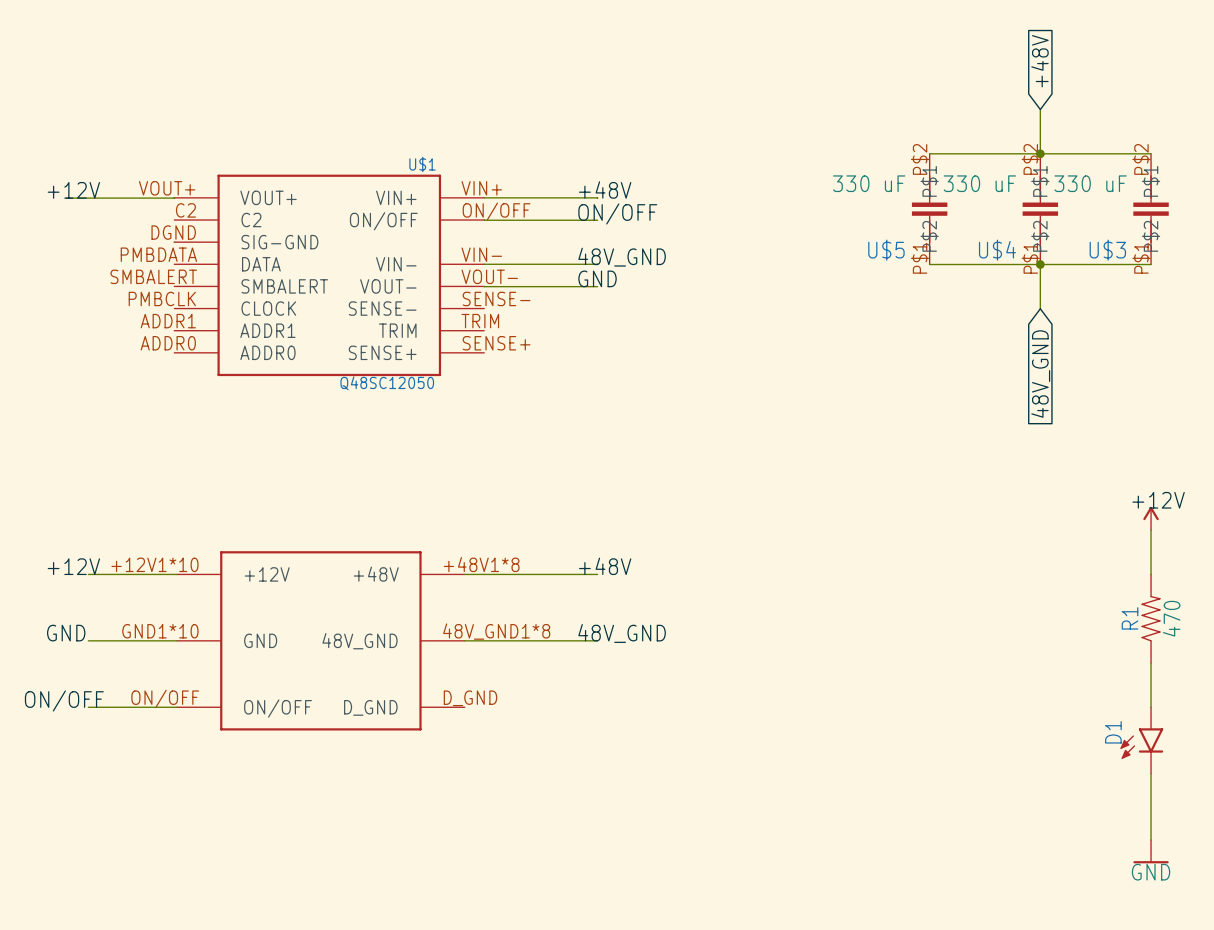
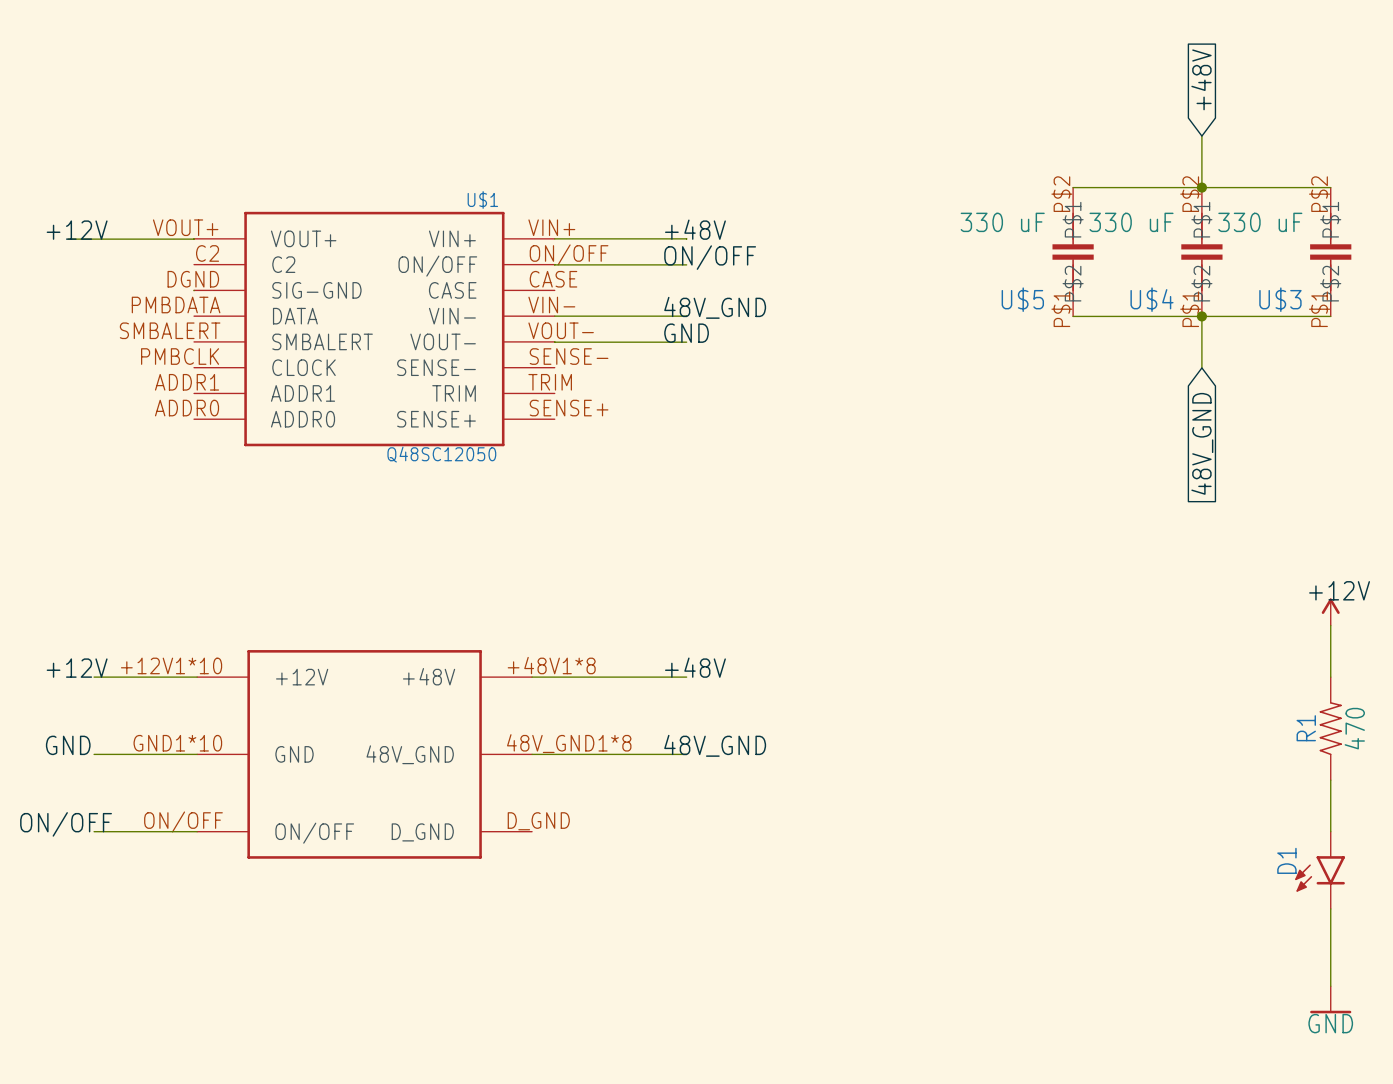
U$1 symbol: [174, 174, 485, 377] -> [194, 211, 555, 447]

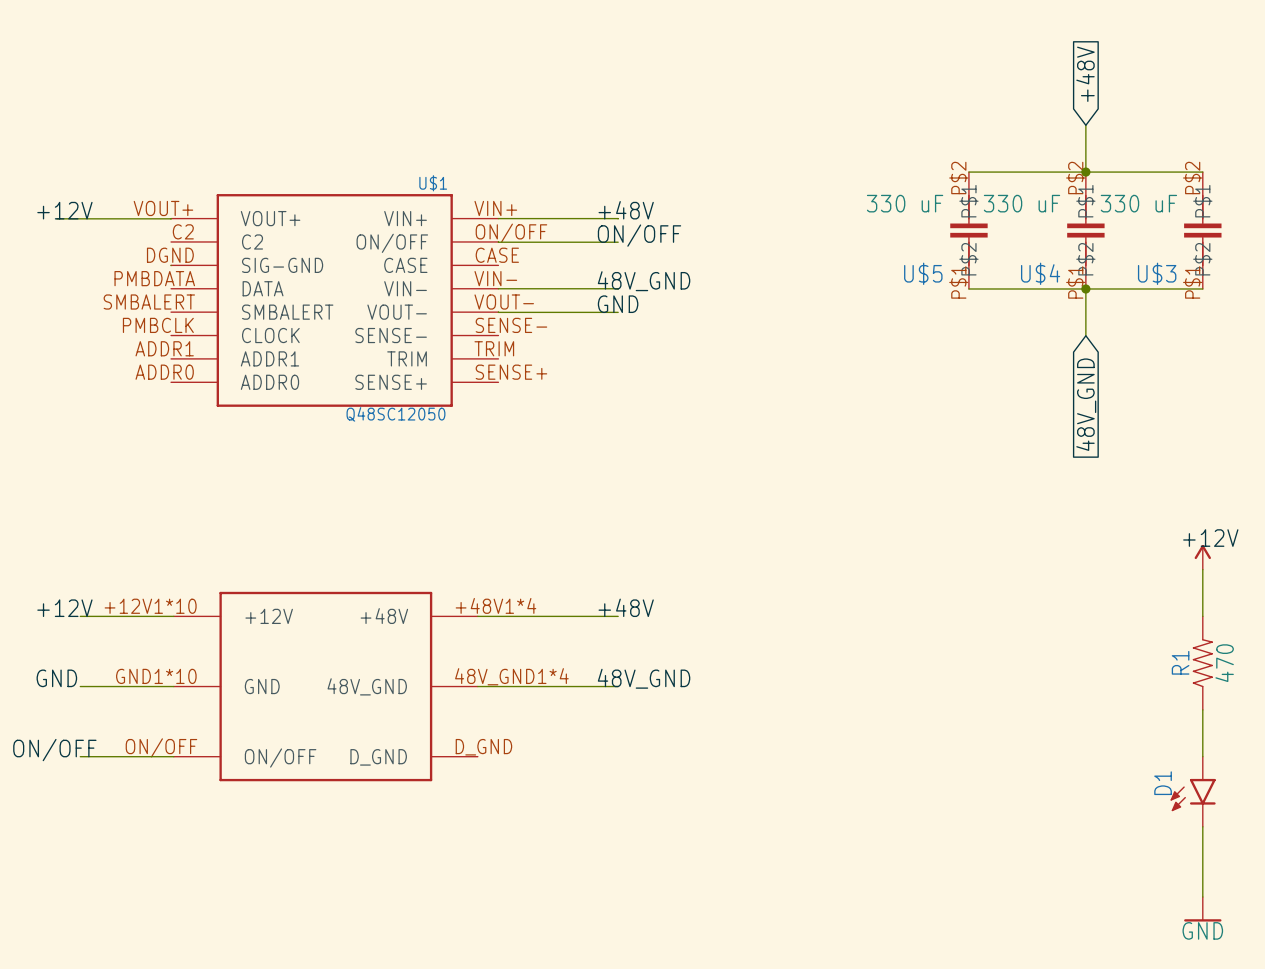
part pin number: +48V1*8 (551, 665) -> +48V1*4 (495, 605)
part pin number: 48V_GND1*8 (569, 743) -> 48V_GND1*4 (511, 676)

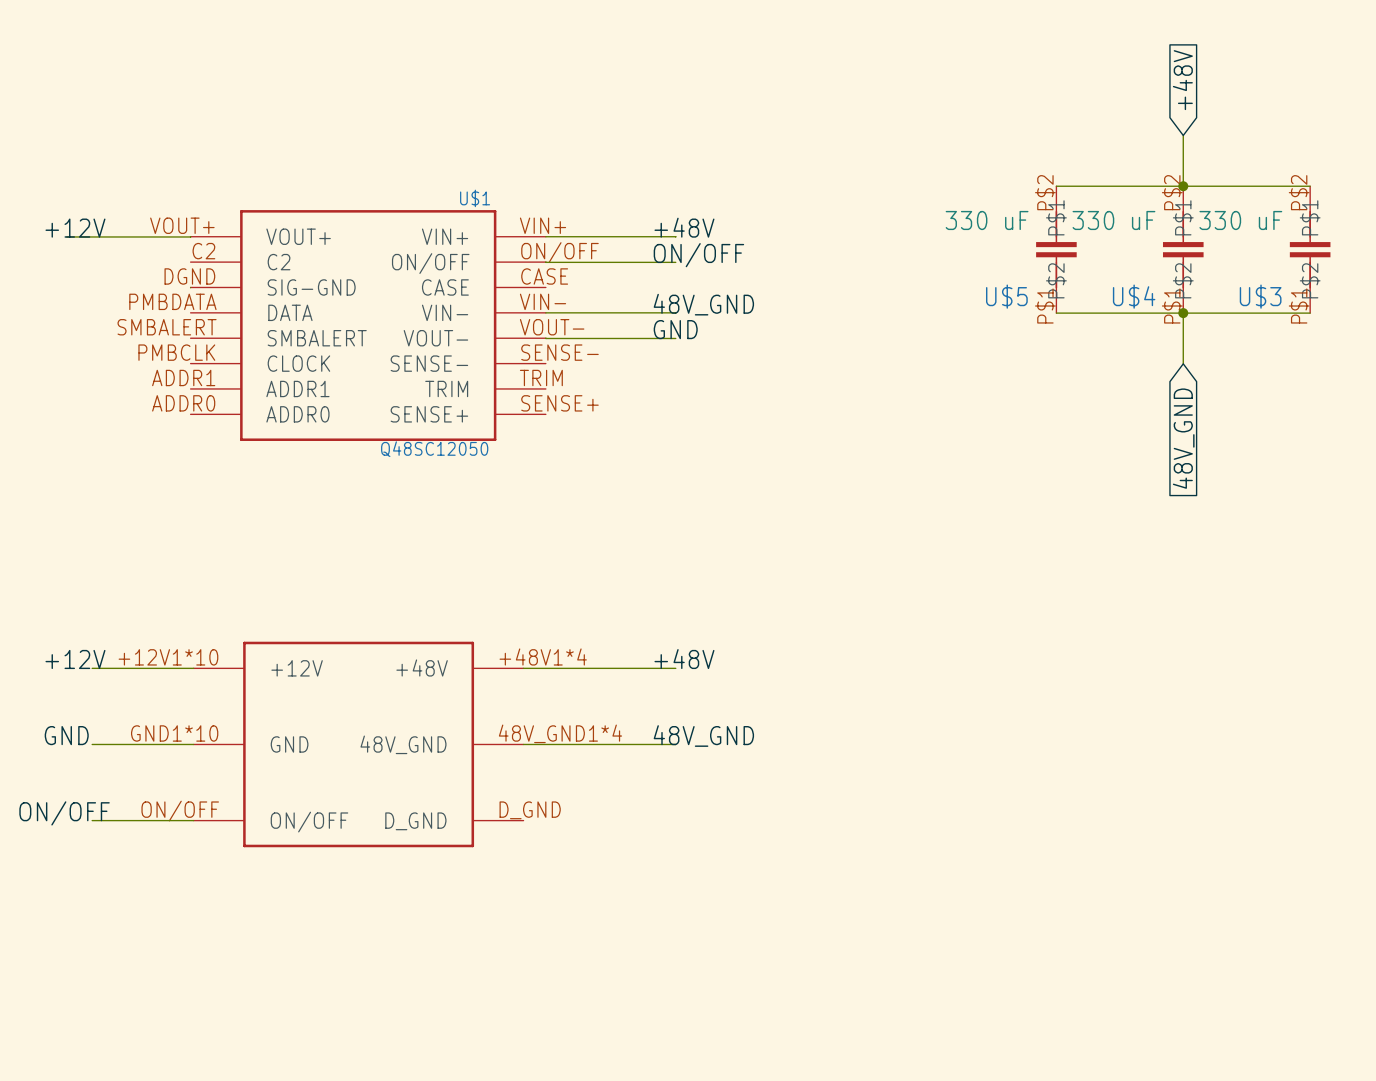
label: +12V (1210, 538) -> none
power symbol: (1202, 557) -> none
wire: (1202, 569) (1202, 616) -> none
R1: 470 (1202, 663) -> none
wire: (1202, 709) (1202, 756) -> none
D1: (1193, 791) -> none
wire: (1202, 826) (1202, 897) -> none
power symbol: GND (1202, 909) -> none

